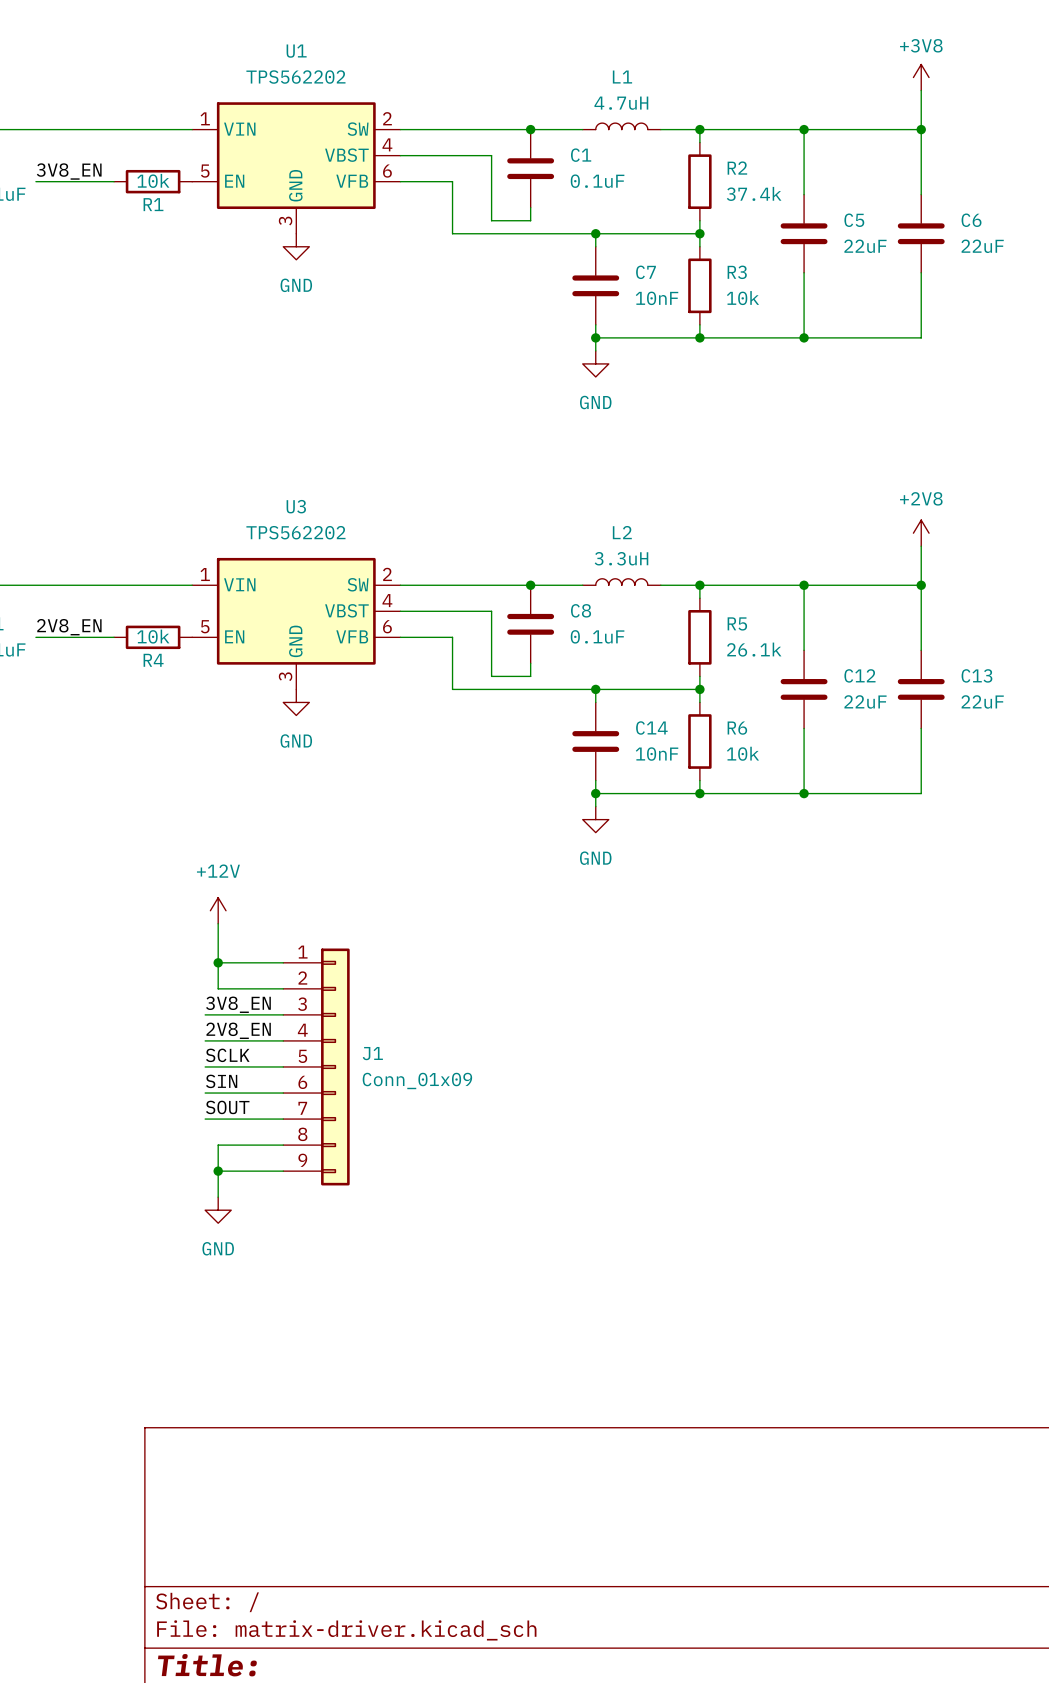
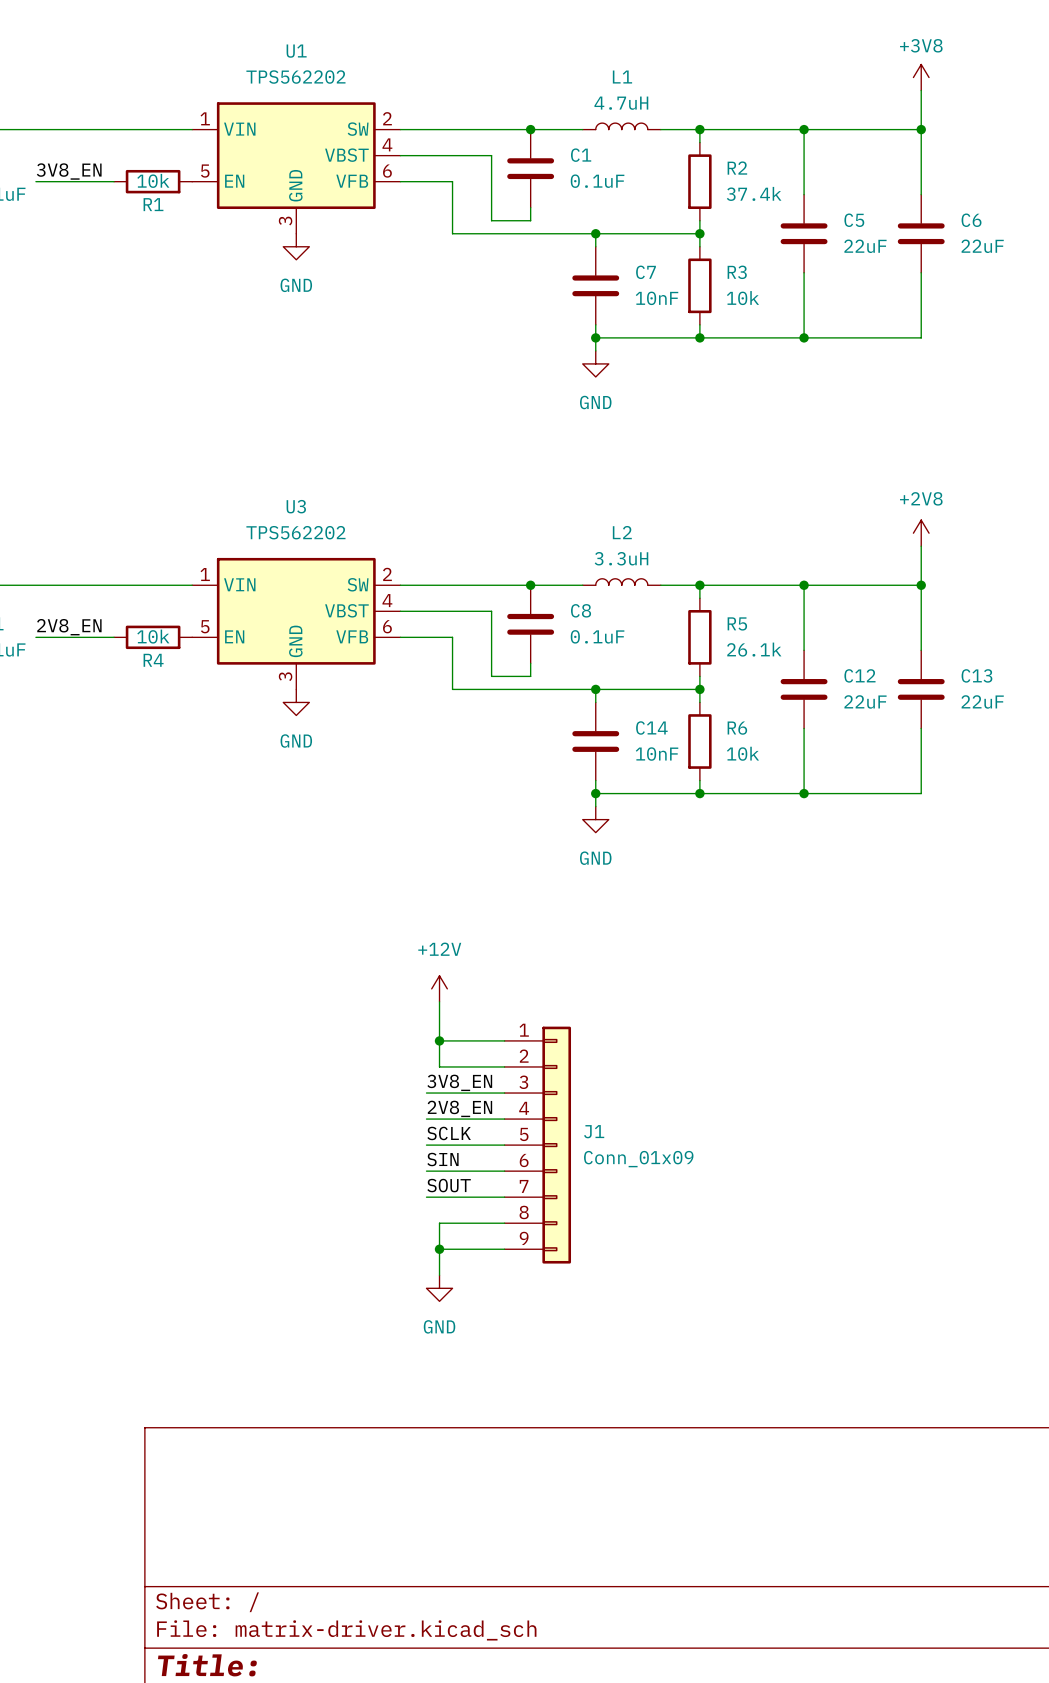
power symbol position: +12V (218, 910) -> +12V (439, 988)
wire: (218, 923) (218, 988) (283, 988) -> (439, 1001) (439, 1066) (504, 1066)
wire: (218, 962) (283, 962) -> (439, 1040) (504, 1040)
junction: (218, 962) -> none
label position: 3V8_EN (238, 1004) -> 3V8_EN (459, 1082)
wire: (205, 1014) (283, 1014) -> (426, 1093) (504, 1093)
label position: 2V8_EN (238, 1030) -> 2V8_EN (459, 1108)
wire: (205, 1040) (283, 1040) -> (426, 1119) (504, 1119)
junction: none -> (439, 1040)
label position: SCLK (227, 1055) -> SCLK (449, 1133)
wire: (205, 1066) (283, 1066) -> (426, 1145) (504, 1145)
J1 position: (316, 1066) -> (537, 1145)
label position: SIN (221, 1081) -> SIN (442, 1159)
wire: (205, 1093) (283, 1093) -> (426, 1171) (504, 1171)
label position: SOUT (227, 1107) -> SOUT (449, 1185)
wire: (205, 1119) (283, 1119) -> (426, 1197) (504, 1197)
wire: (283, 1145) (218, 1145) (218, 1197) -> (504, 1223) (439, 1223) (439, 1275)
wire: (218, 1171) (283, 1171) -> (439, 1249) (504, 1249)
junction: (218, 1171) -> none
power symbol position: GND (218, 1210) -> GND (439, 1288)
junction: none -> (439, 1249)

